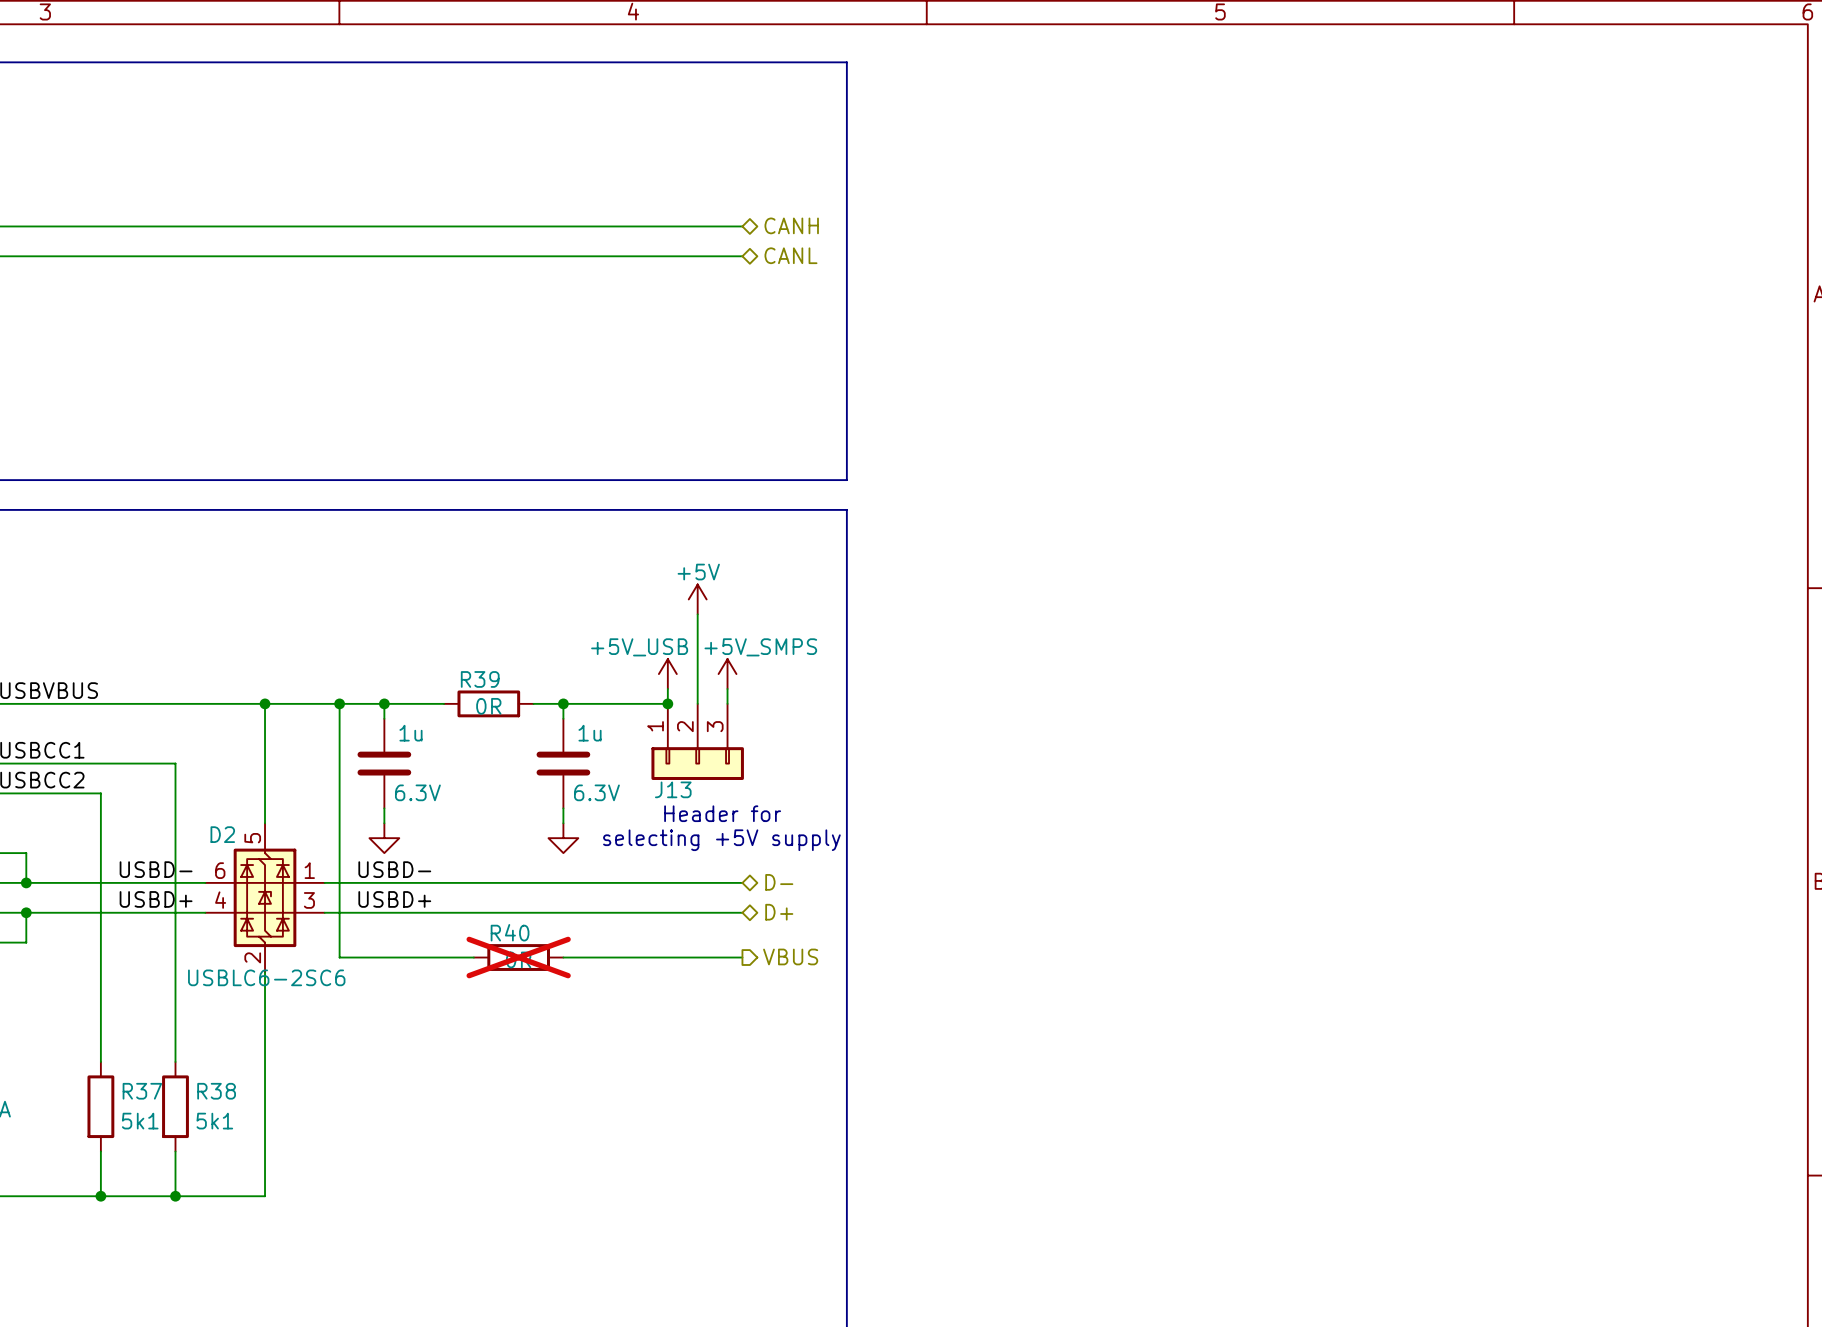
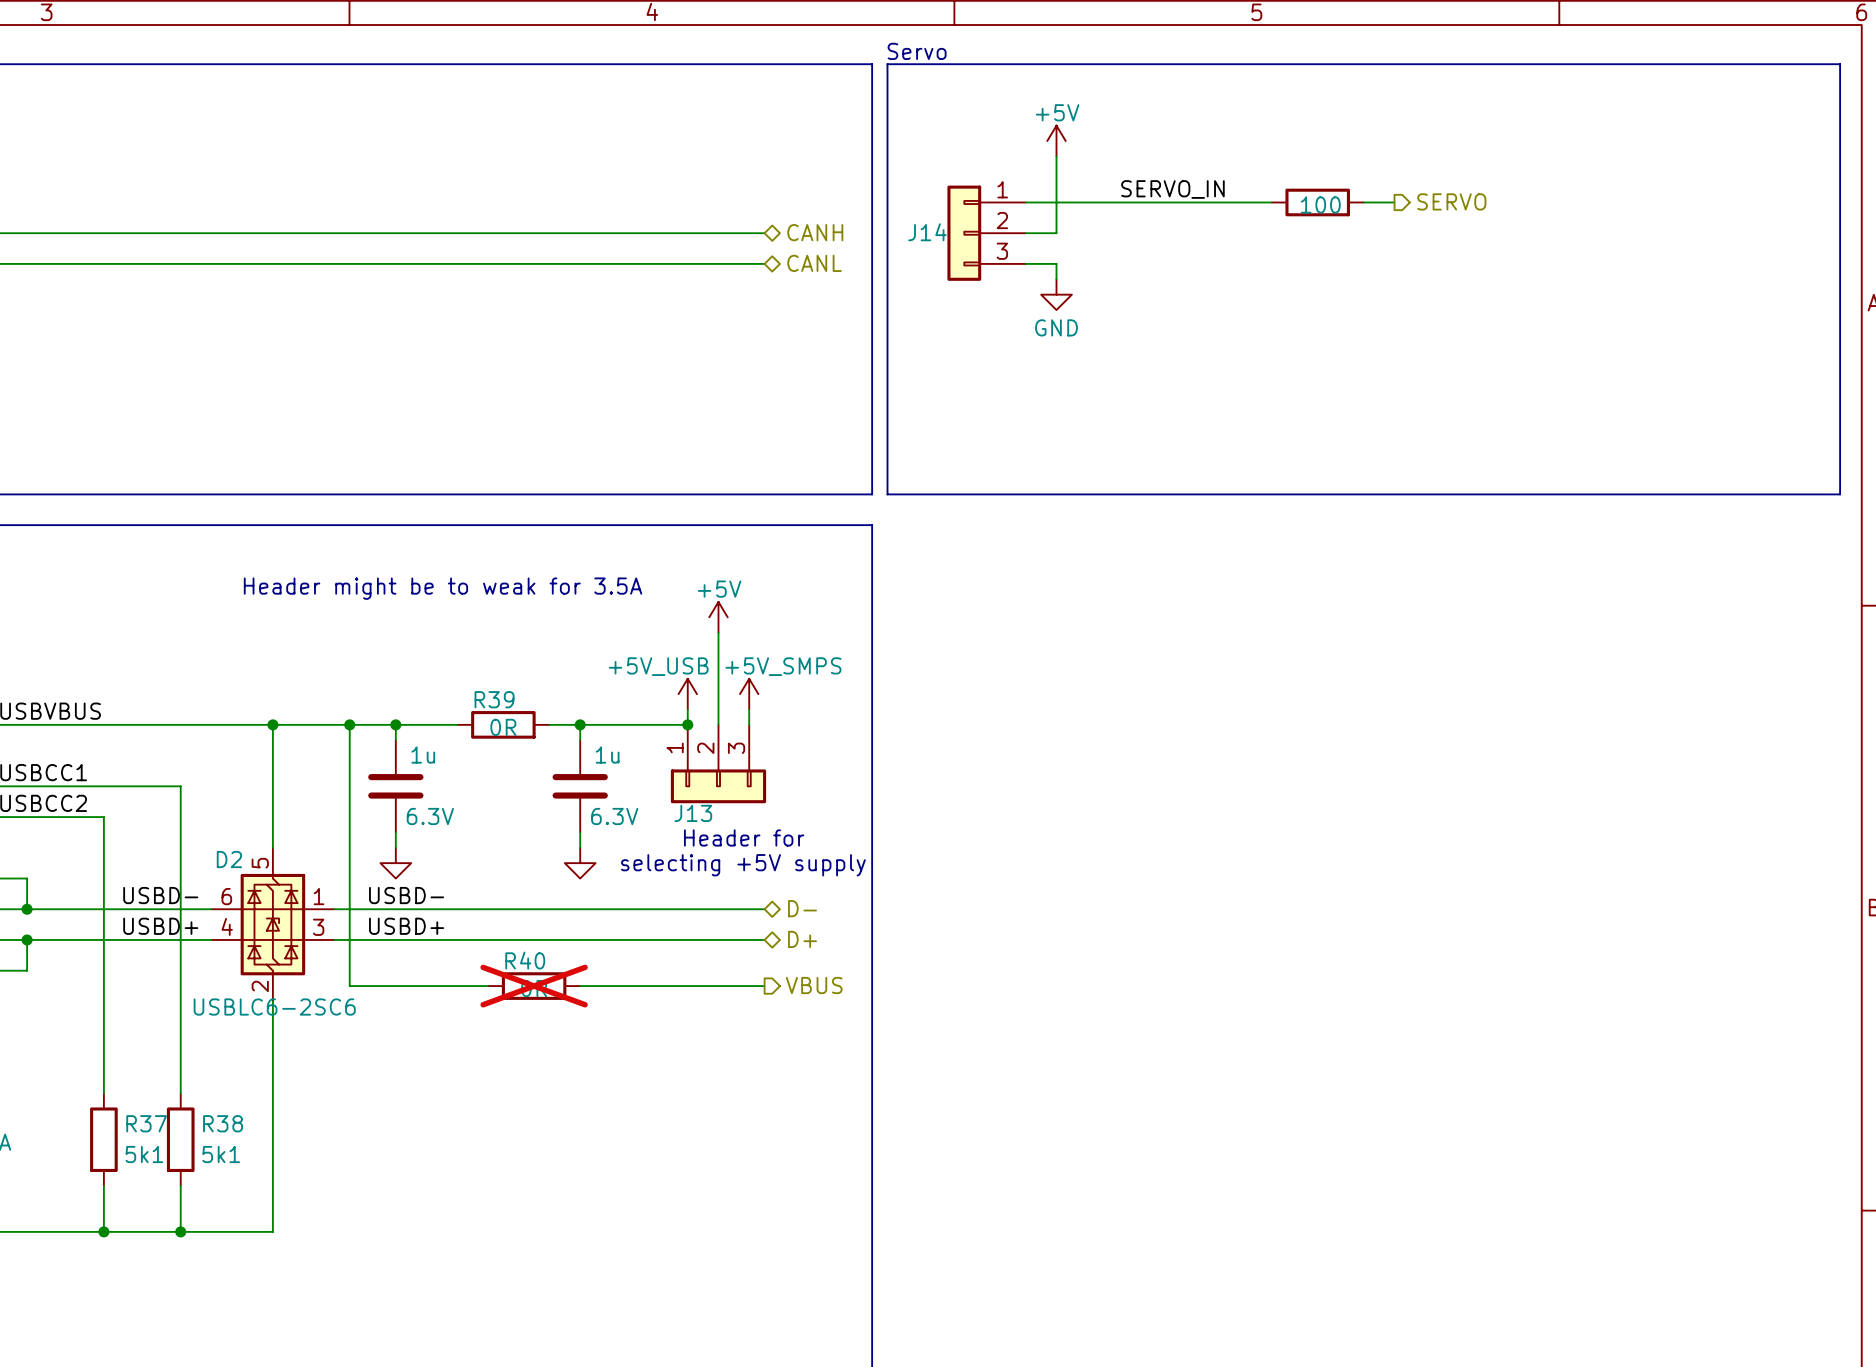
text: none -> Servo (917, 51)
line: none -> (887, 64) (1840, 64) (1840, 494) (887, 494) (887, 64)
power symbol: none -> +5V (1056, 141)
wire: none -> (1056, 156) (1056, 233) (1025, 233)
label: none -> SERVO_IN (1172, 189)
wire: none -> (1025, 202) (1271, 202)
part: none -> 100 (1317, 202)
wire: none -> (1363, 202) (1394, 202)
hierarchical label: none -> SERVO (1451, 201)
J14: none -> (986, 233)
wire: none -> (1025, 263) (1056, 263) (1056, 279)
power symbol: none -> GND (1056, 294)
text: none -> Header might be to weak for 3.5A (443, 588)

